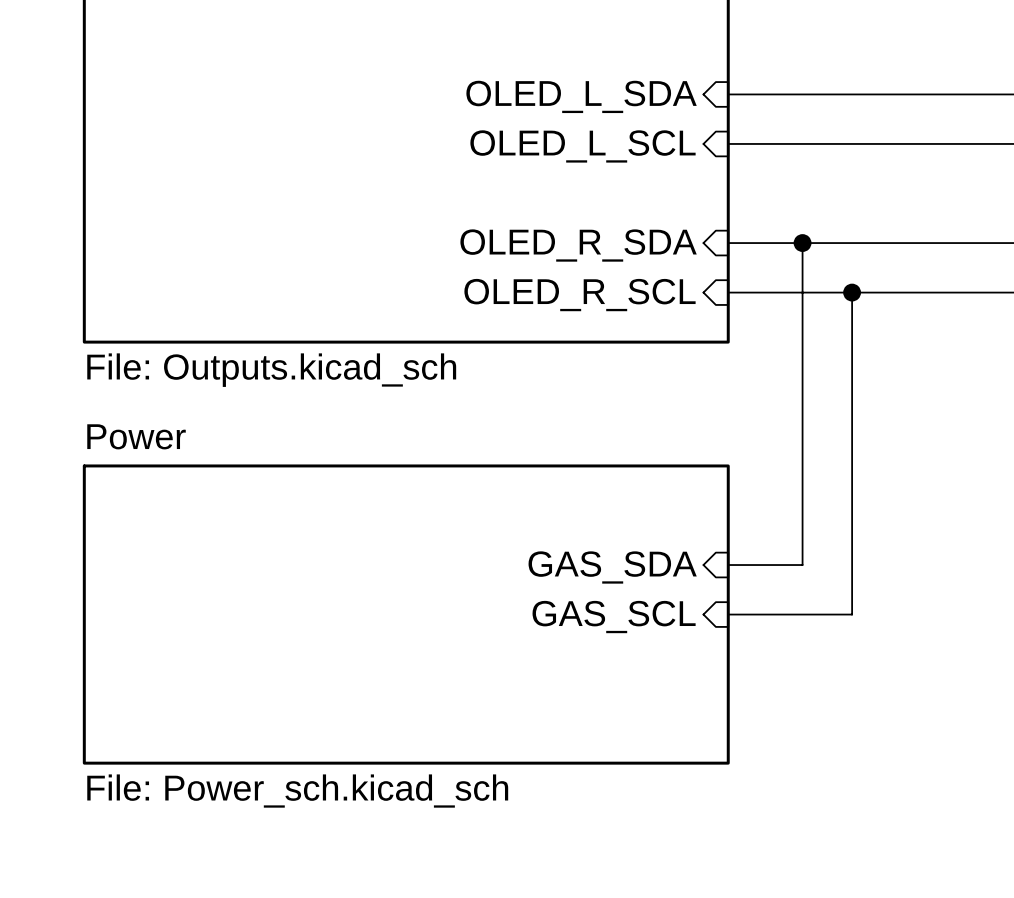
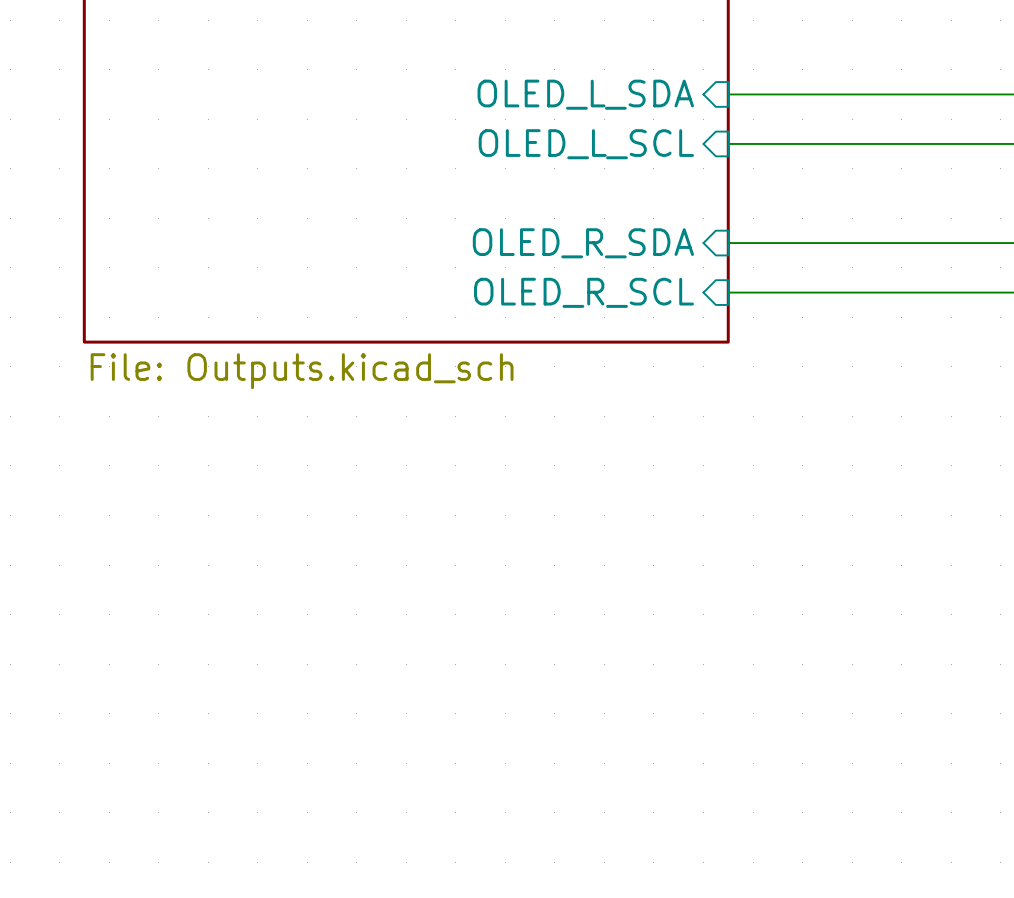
wire: (802, 243) (802, 565) (728, 565) -> none
junction: (802, 243) -> none
wire: (852, 292) (852, 614) (728, 614) -> none
junction: (852, 292) -> none
sheet pin: GAS_SDA (612, 567) -> none
sheet Power: File: Power_sch.kicad_sch (406, 614) -> none
sheet pin: GAS_SCL (614, 617) -> none

